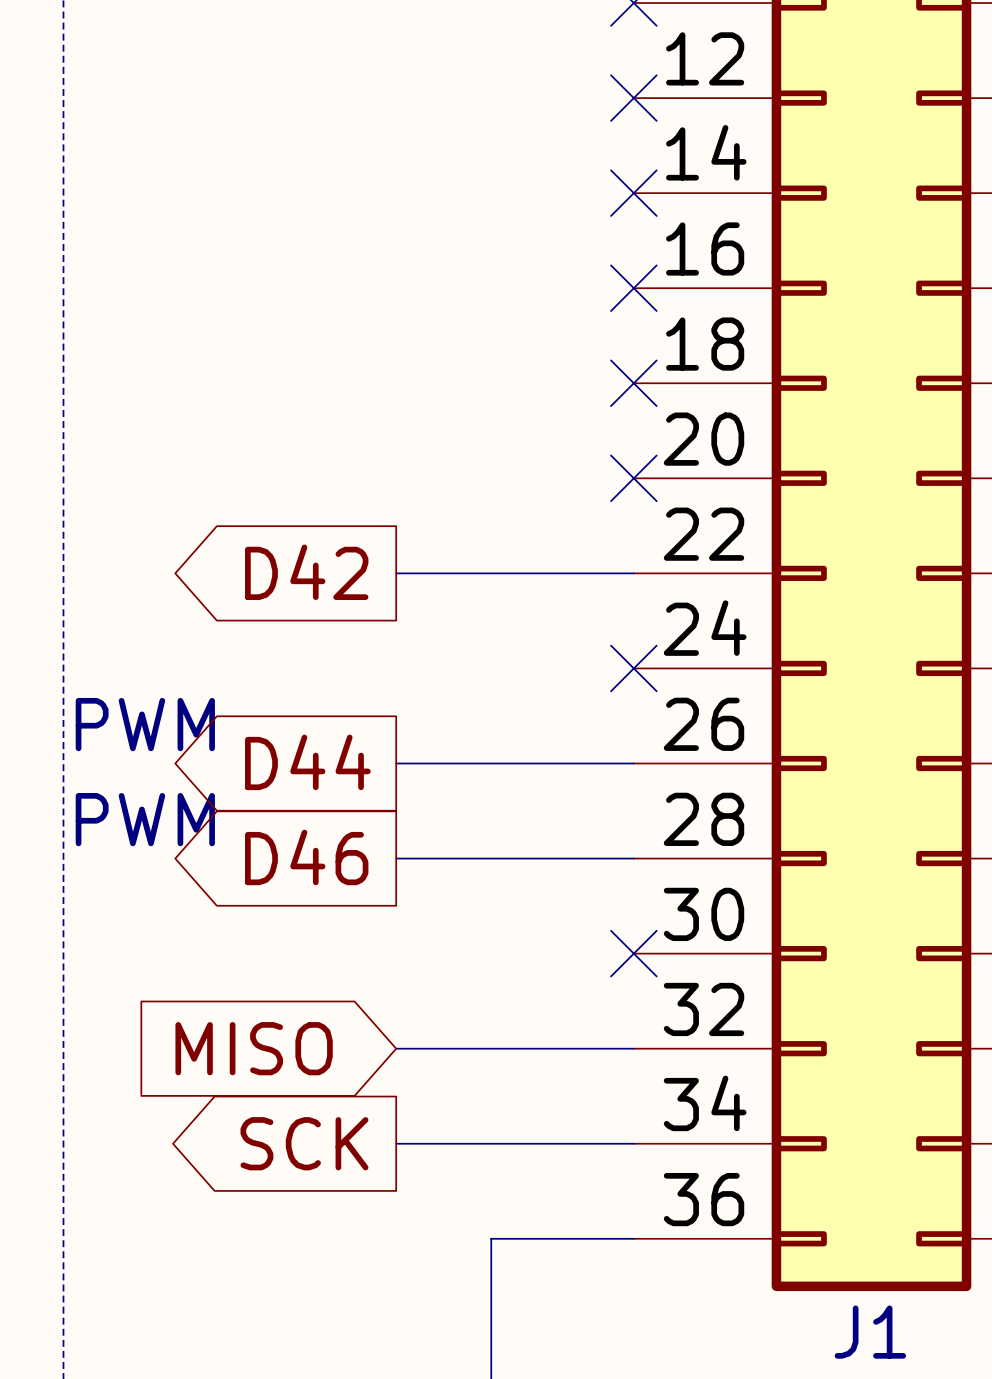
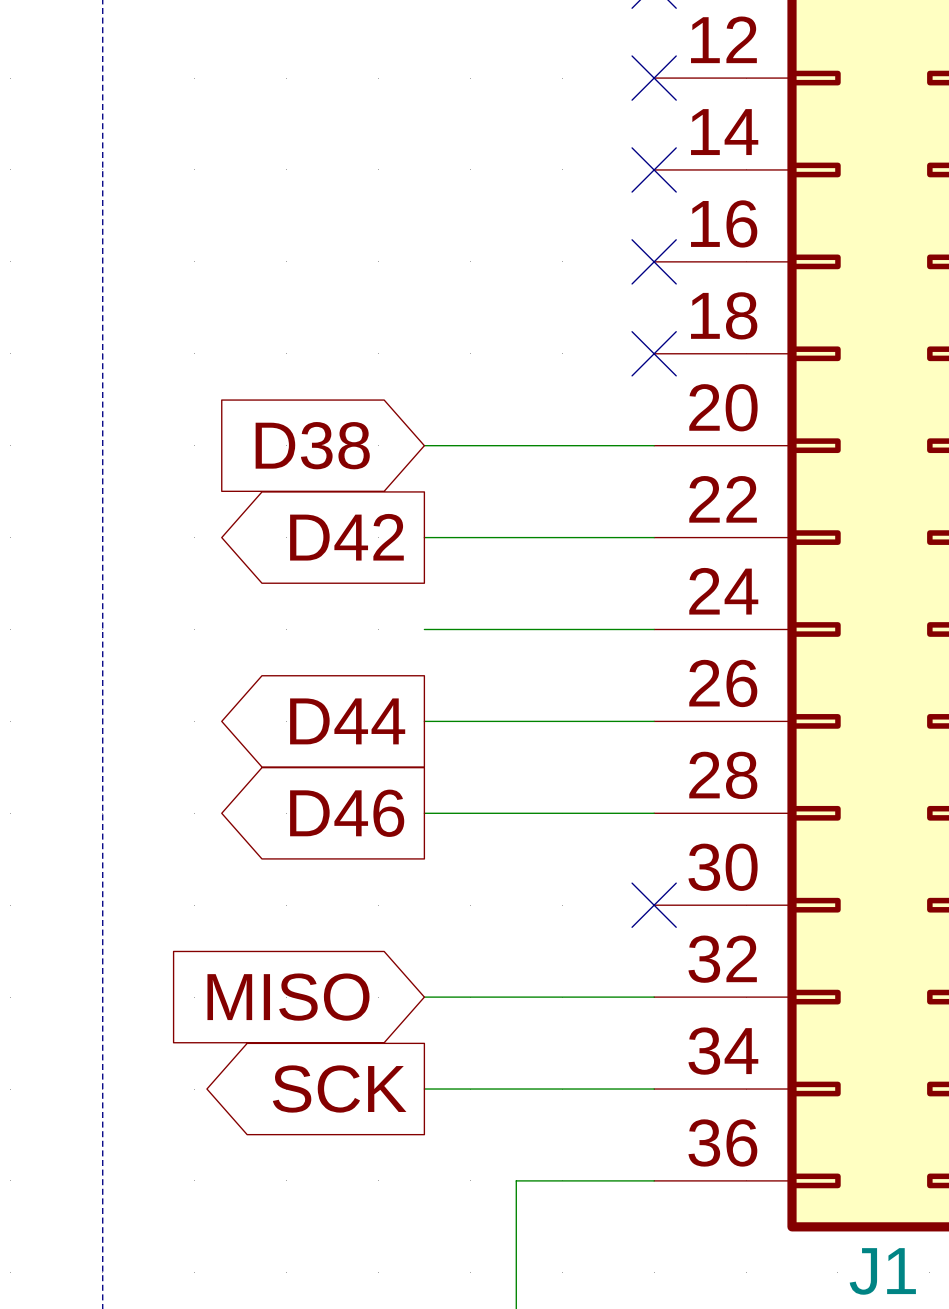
global label: none -> D38 (312, 445)
wire: none -> (424, 445) (654, 445)
no-connect mark: (633, 478) -> none
wire: none -> (424, 629) (654, 629)
no-connect mark: (633, 668) -> none
text: PWM (145, 724) -> none
text: PWM (145, 819) -> none

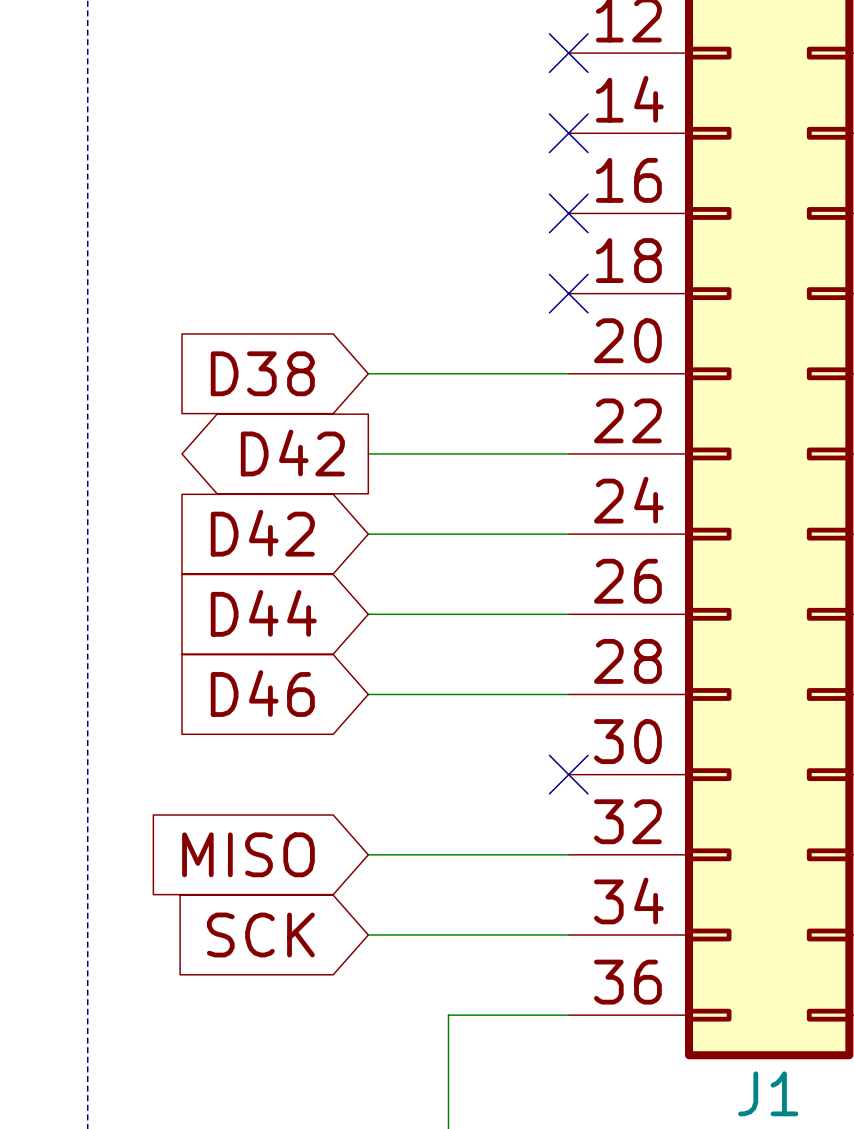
global label: none -> D42 (262, 533)
global label shape: output (347, 721) -> input (263, 613)
global label shape: output (347, 813) -> input (262, 693)
global label shape: output (339, 1088) -> input (260, 934)

